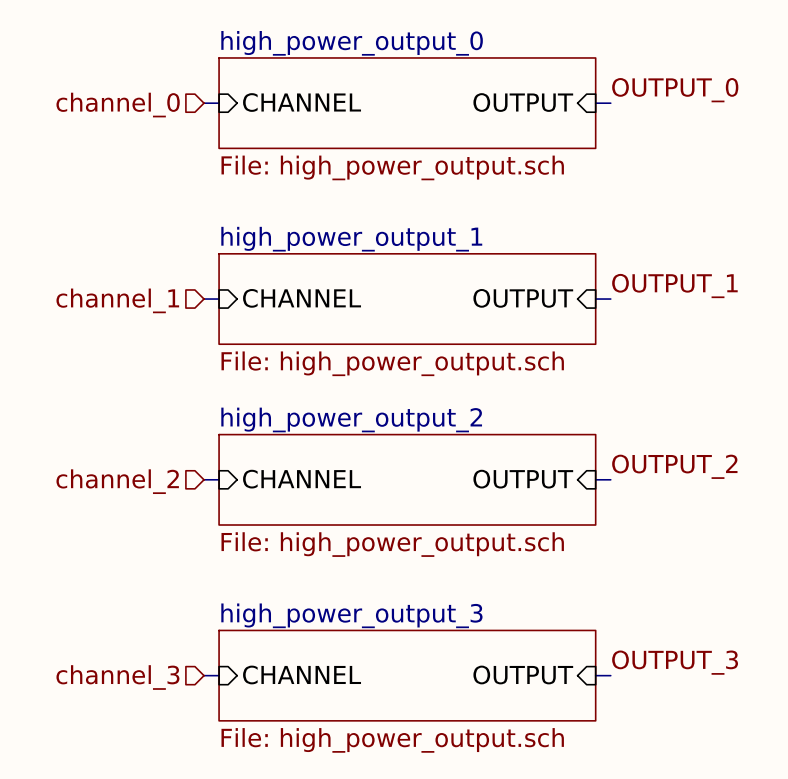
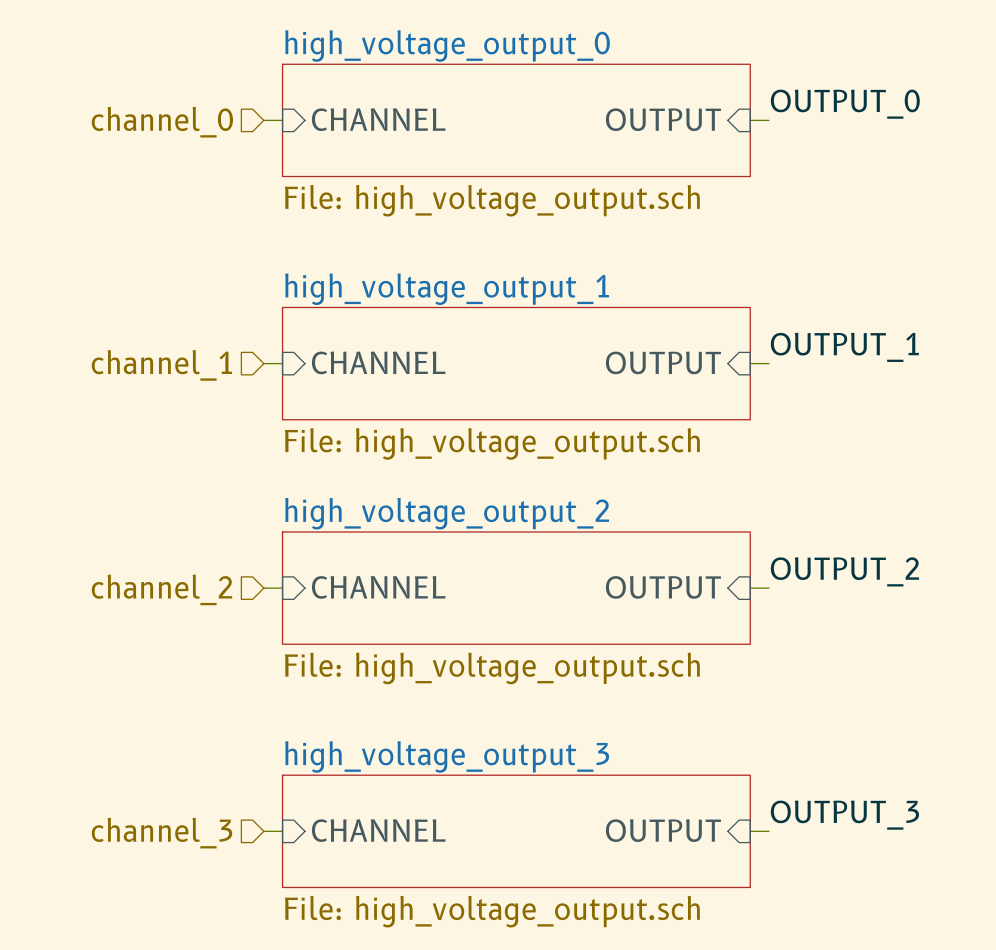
sheet high_power_output_0 name: high_power_output_0 (352, 43) -> high_voltage_output_0 (447, 46)
sheet high_power_output_0 value: File: high_power_output.sch (392, 167) -> File: high_voltage_output.sch (492, 200)
sheet high_power_output_1 name: high_power_output_1 (351, 239) -> high_voltage_output_1 (447, 289)
sheet high_power_output_1 value: File: high_power_output.sch (392, 363) -> File: high_voltage_output.sch (492, 443)
sheet high_power_output_2 name: high_power_output_2 (351, 419) -> high_voltage_output_2 (447, 513)
sheet high_power_output_2 value: File: high_power_output.sch (392, 544) -> File: high_voltage_output.sch (492, 668)
sheet high_power_output_3 name: high_power_output_3 (351, 615) -> high_voltage_output_3 (447, 756)
sheet high_power_output_3 value: File: high_power_output.sch (392, 740) -> File: high_voltage_output.sch (492, 911)

